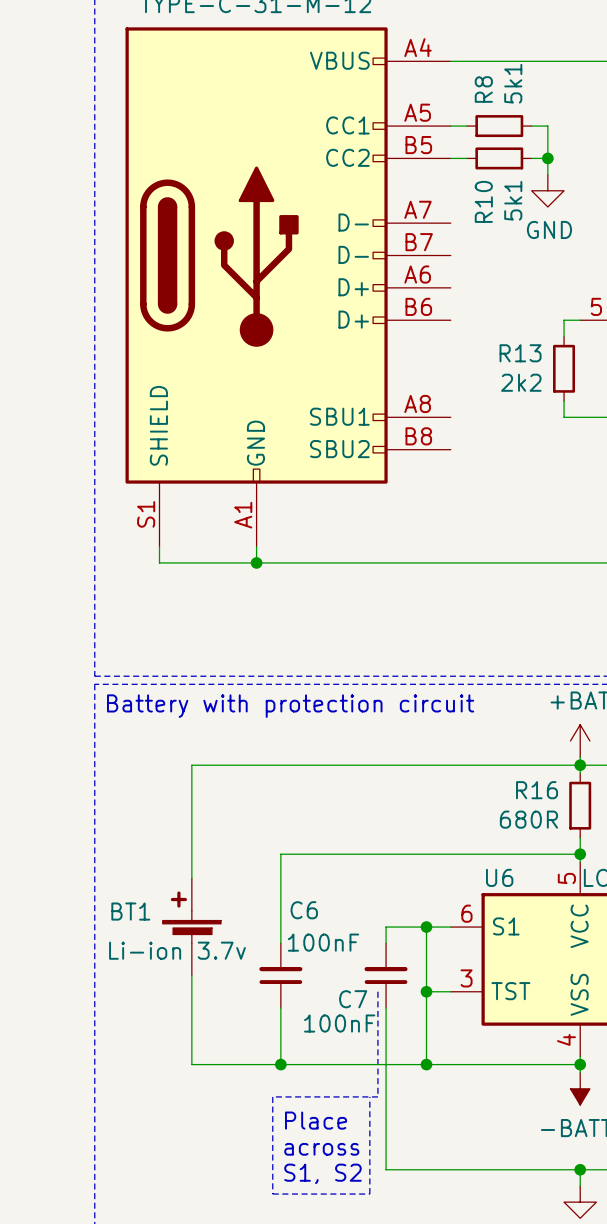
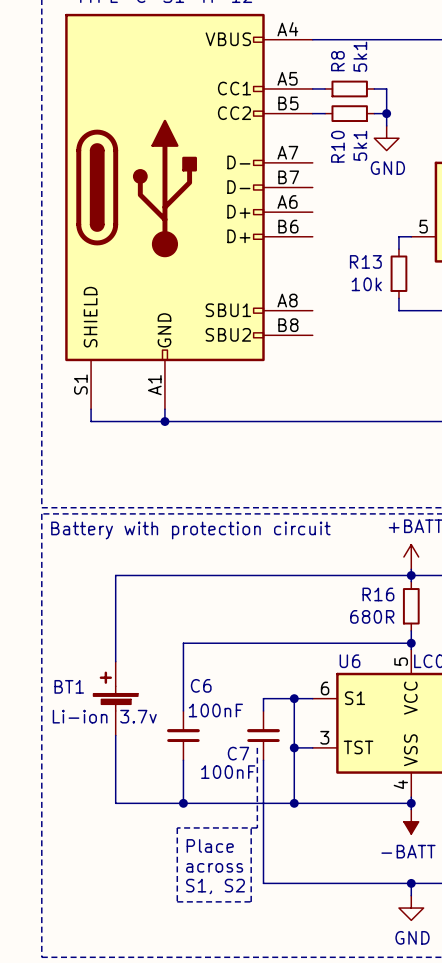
R13 value: 2k2 (521, 382) -> 10k (366, 284)

